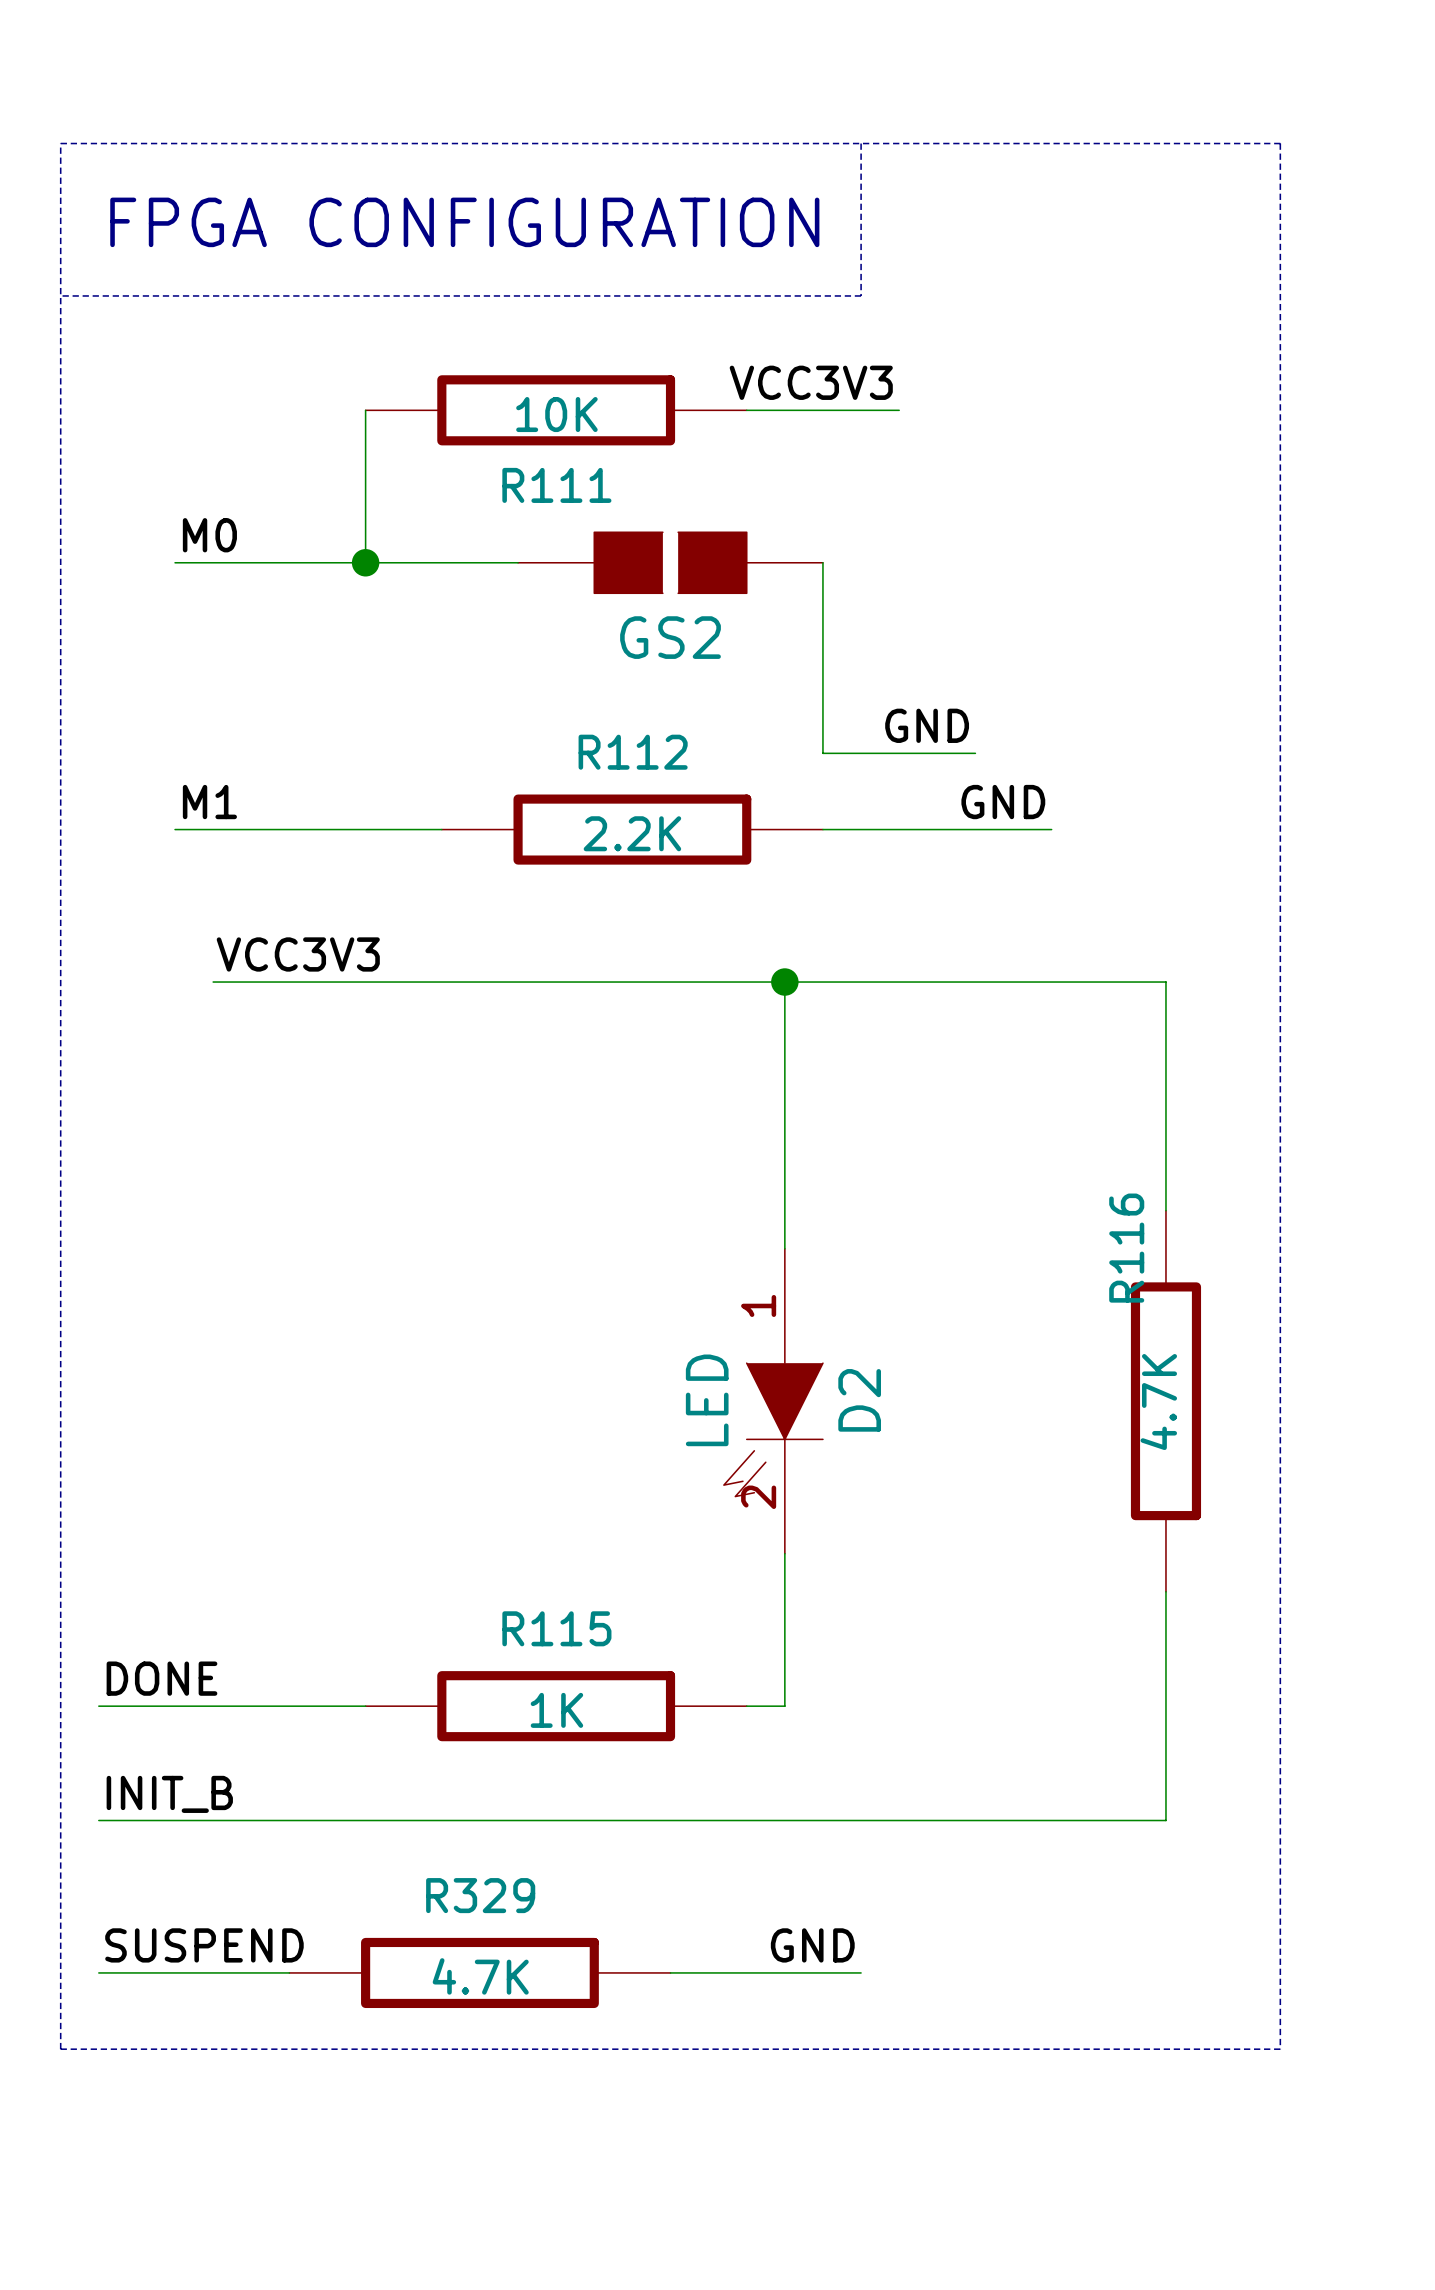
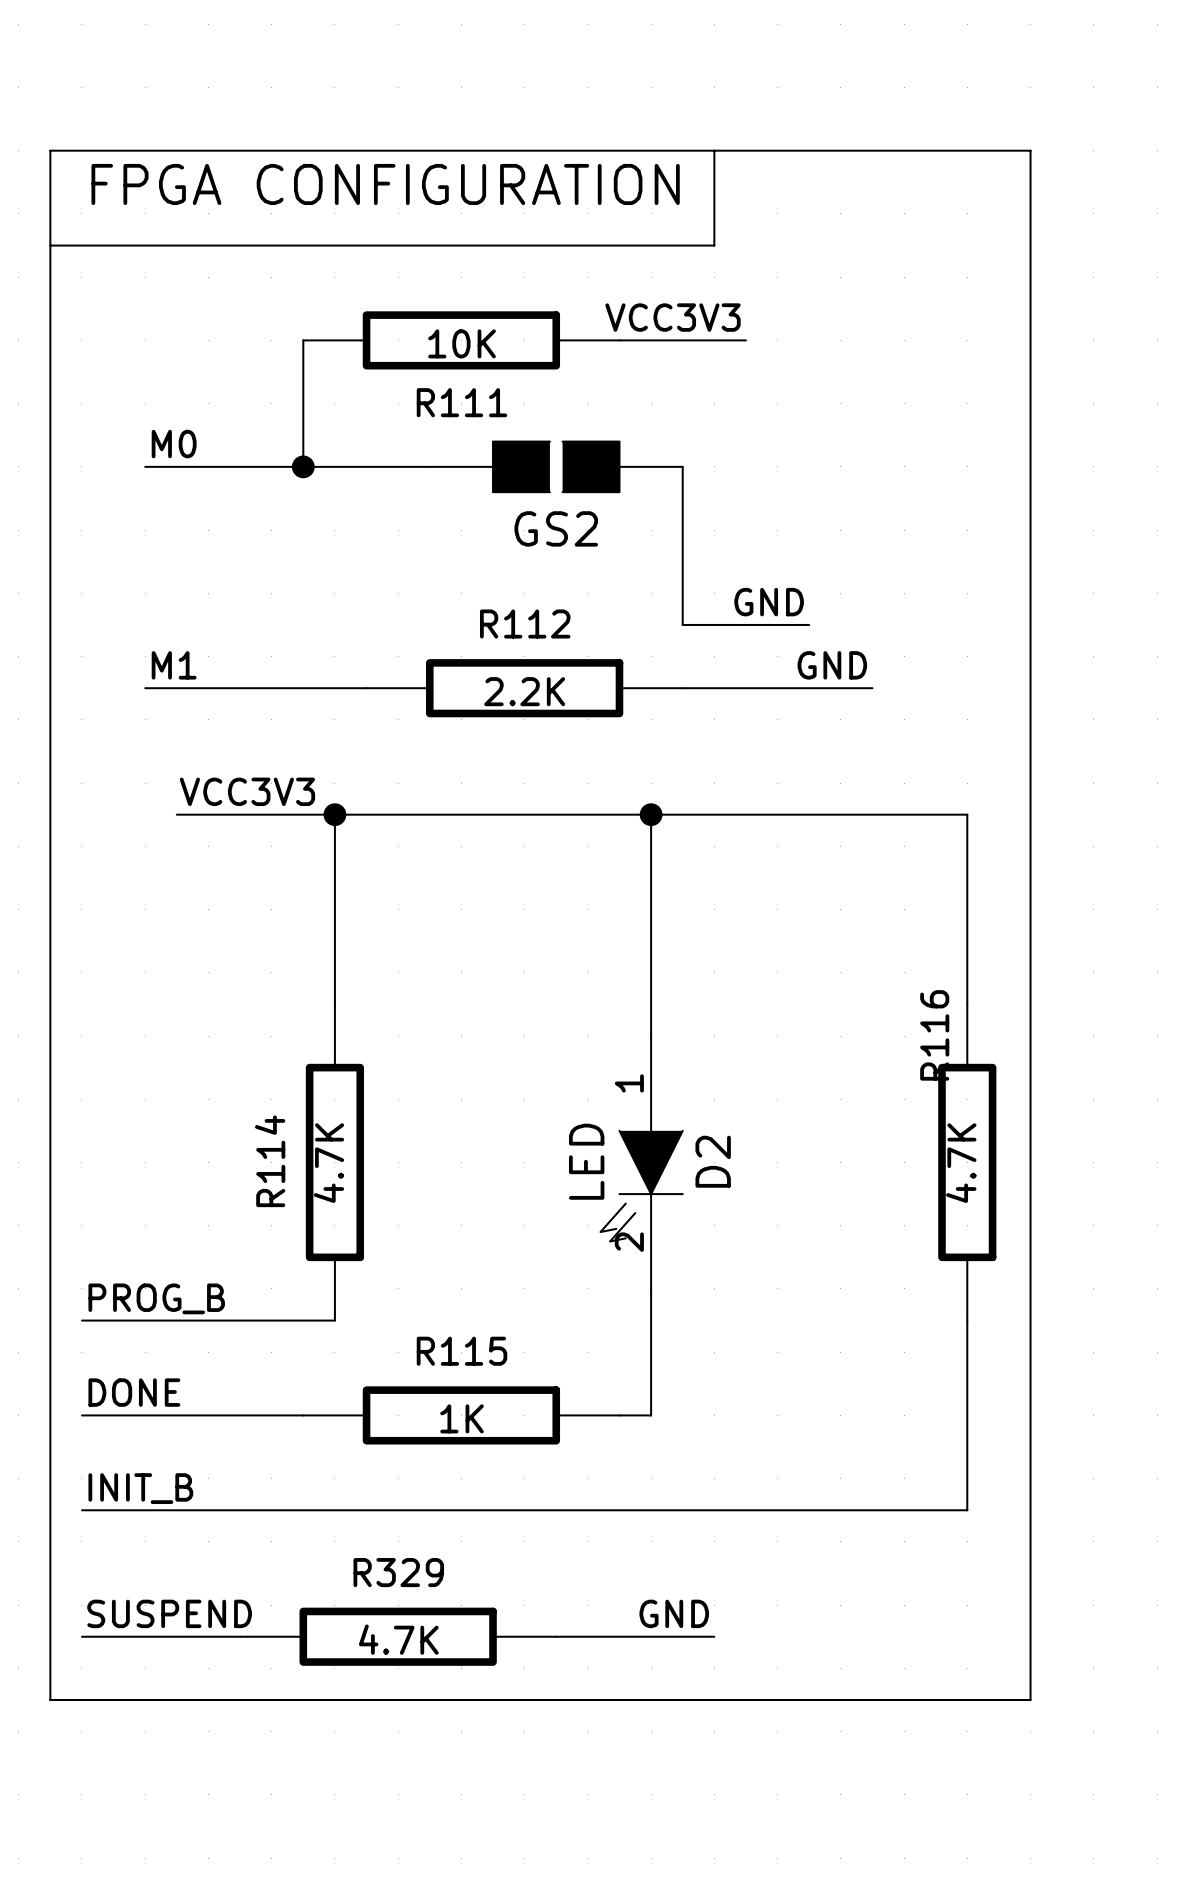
line: (60, 143) (1280, 143) (1280, 2049) (60, 2049) (60, 143) -> none
line: (861, 143) (861, 295) (60, 295) -> none
bus: none -> (50, 150) (50, 1699) (1030, 1699) (1030, 150) (50, 150)
bus: none -> (714, 150) (714, 245) (50, 245)
wire: none -> (334, 814) (334, 1004)
junction: none -> (334, 814)
R114: none -> 4.7K (334, 1162)
label: none -> PROG_B (156, 1298)
wire: none -> (81, 1320) (334, 1320)

